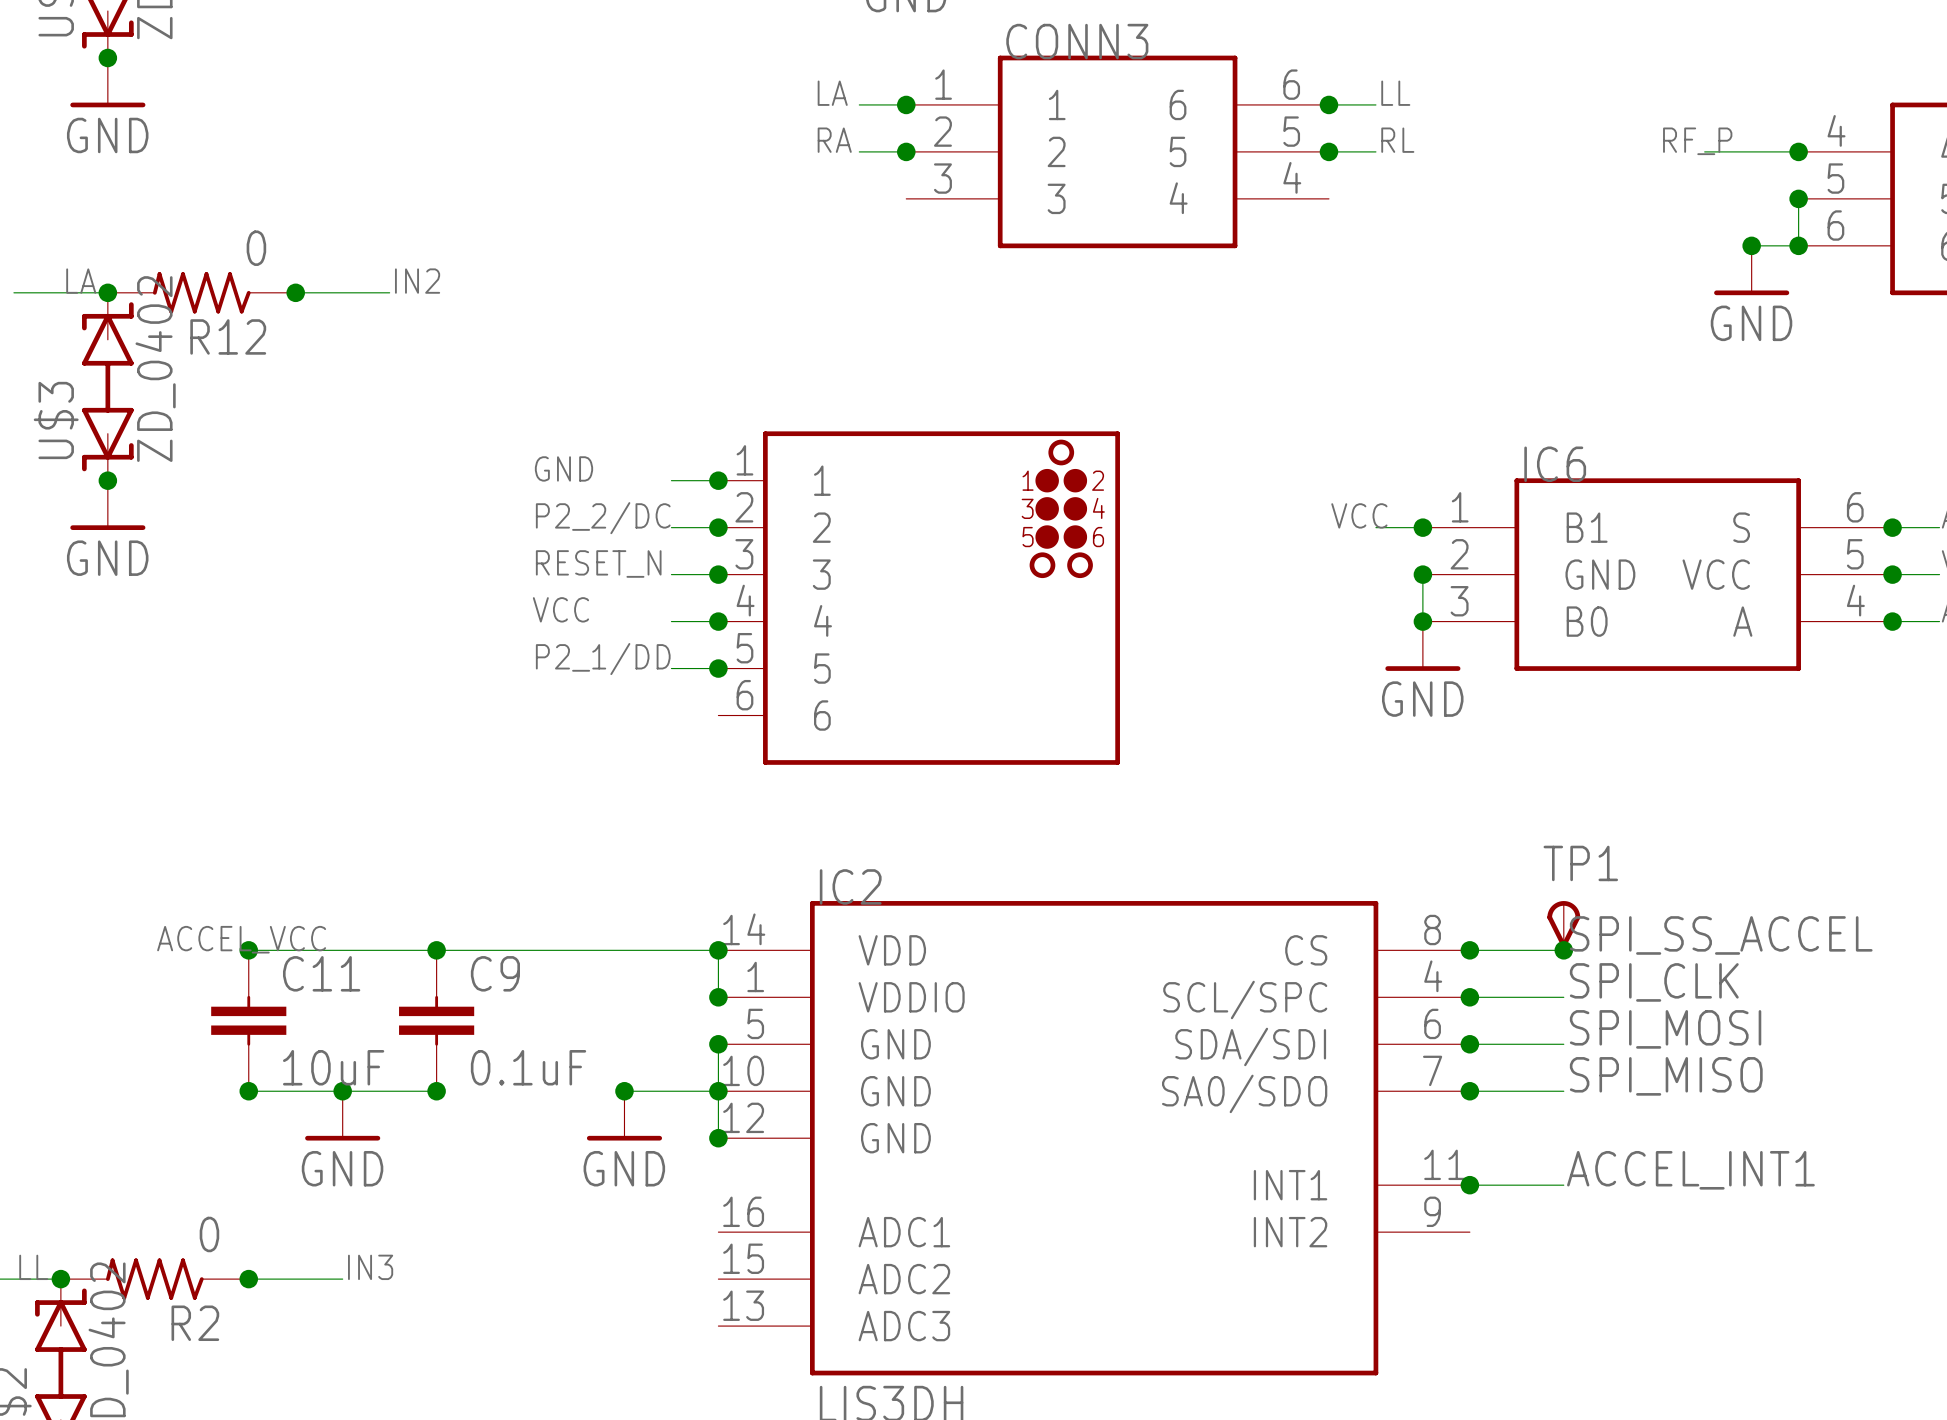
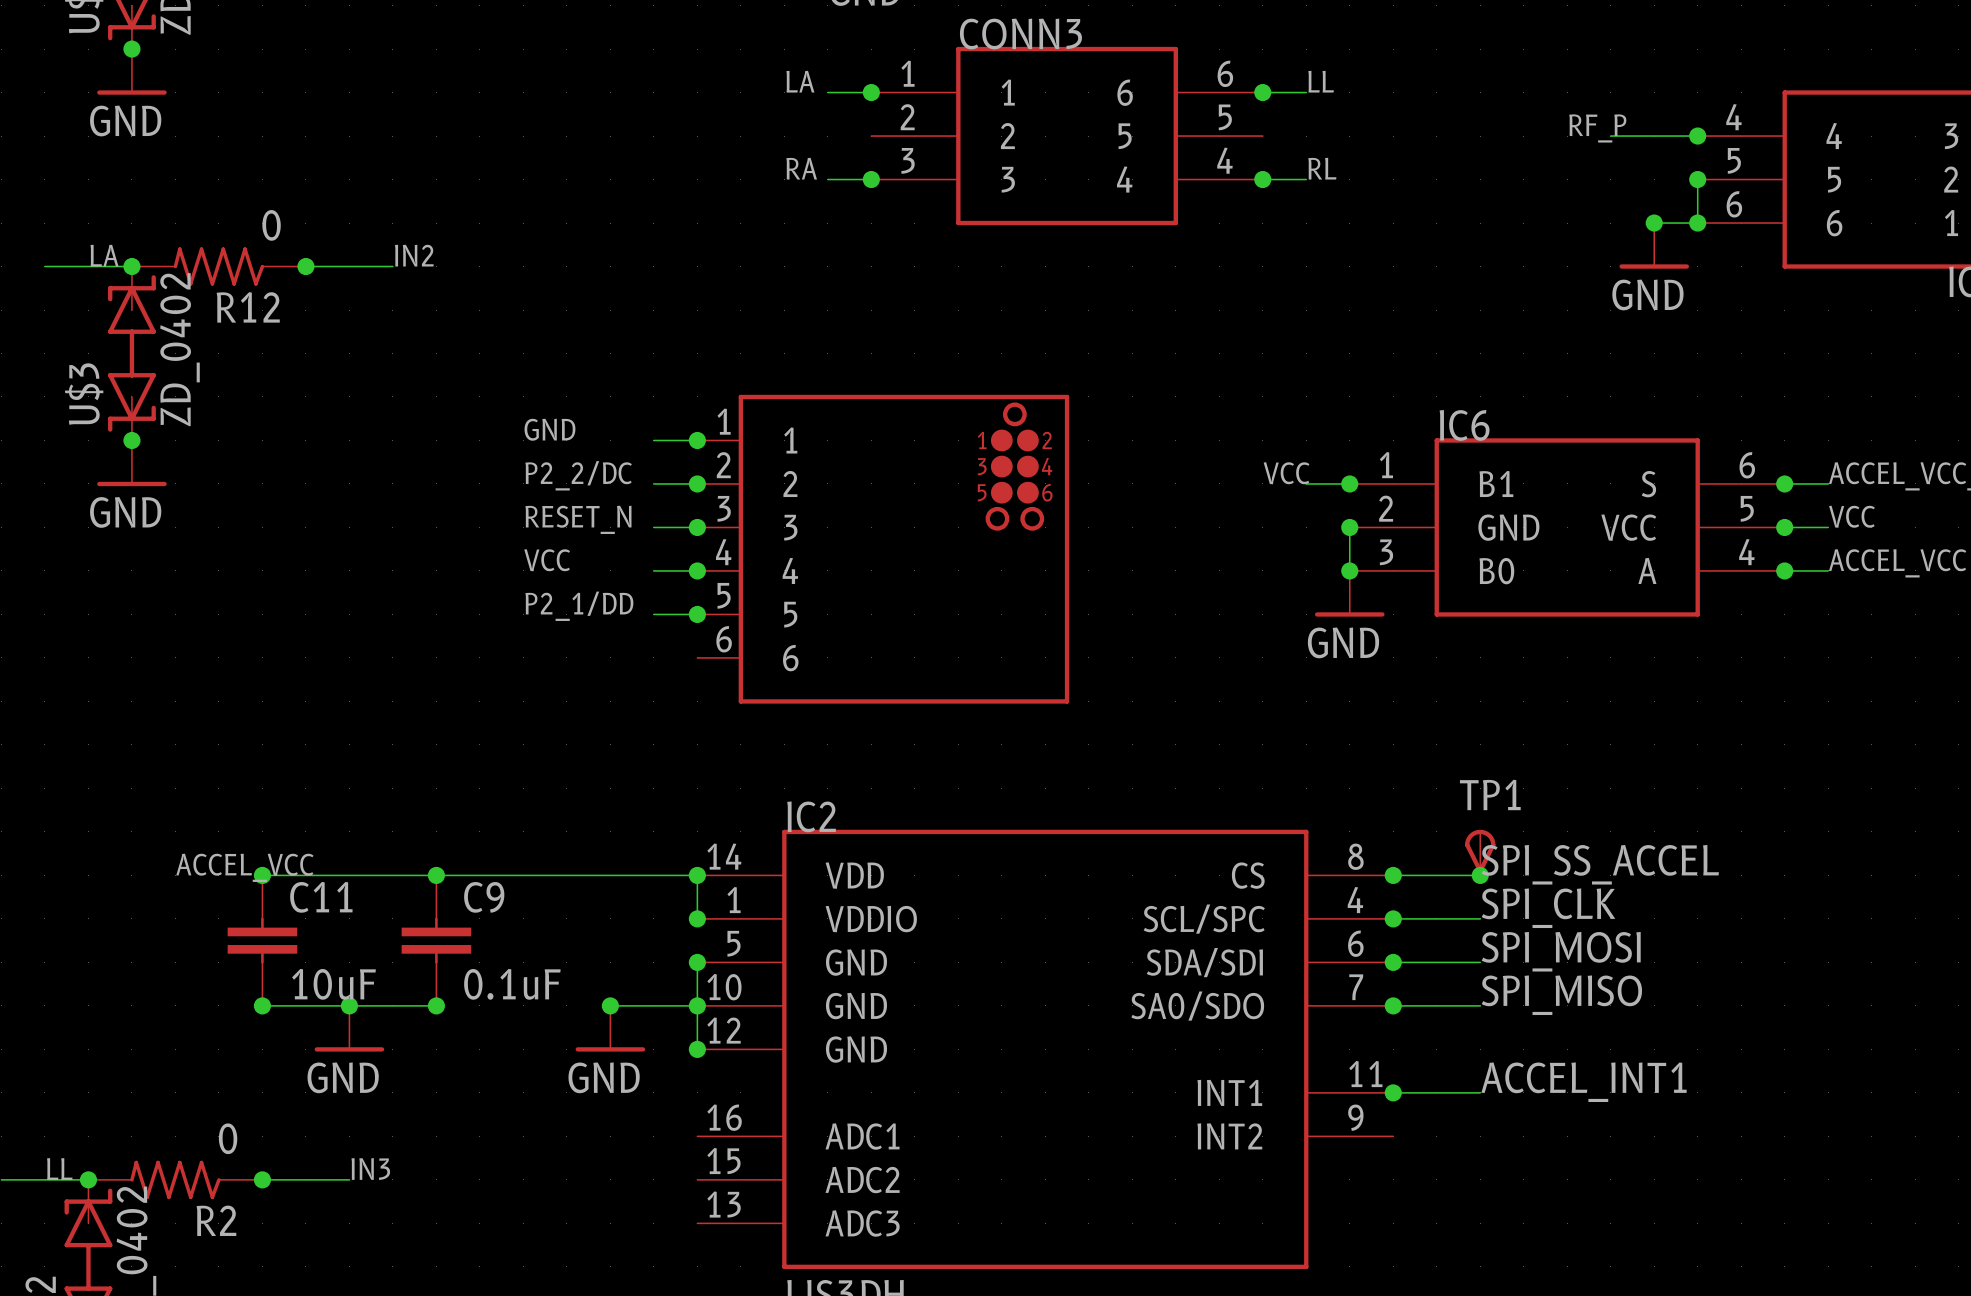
label position: RA (834, 140) -> RA (801, 168)
label position: RL (1397, 140) -> RL (1322, 168)
wire: (859, 151) (906, 151) -> (827, 179) (871, 179)
junction position: (906, 151) -> (871, 179)
wire: (1328, 151) (1375, 151) -> (1262, 179) (1306, 179)
junction position: (1328, 151) -> (1262, 179)

